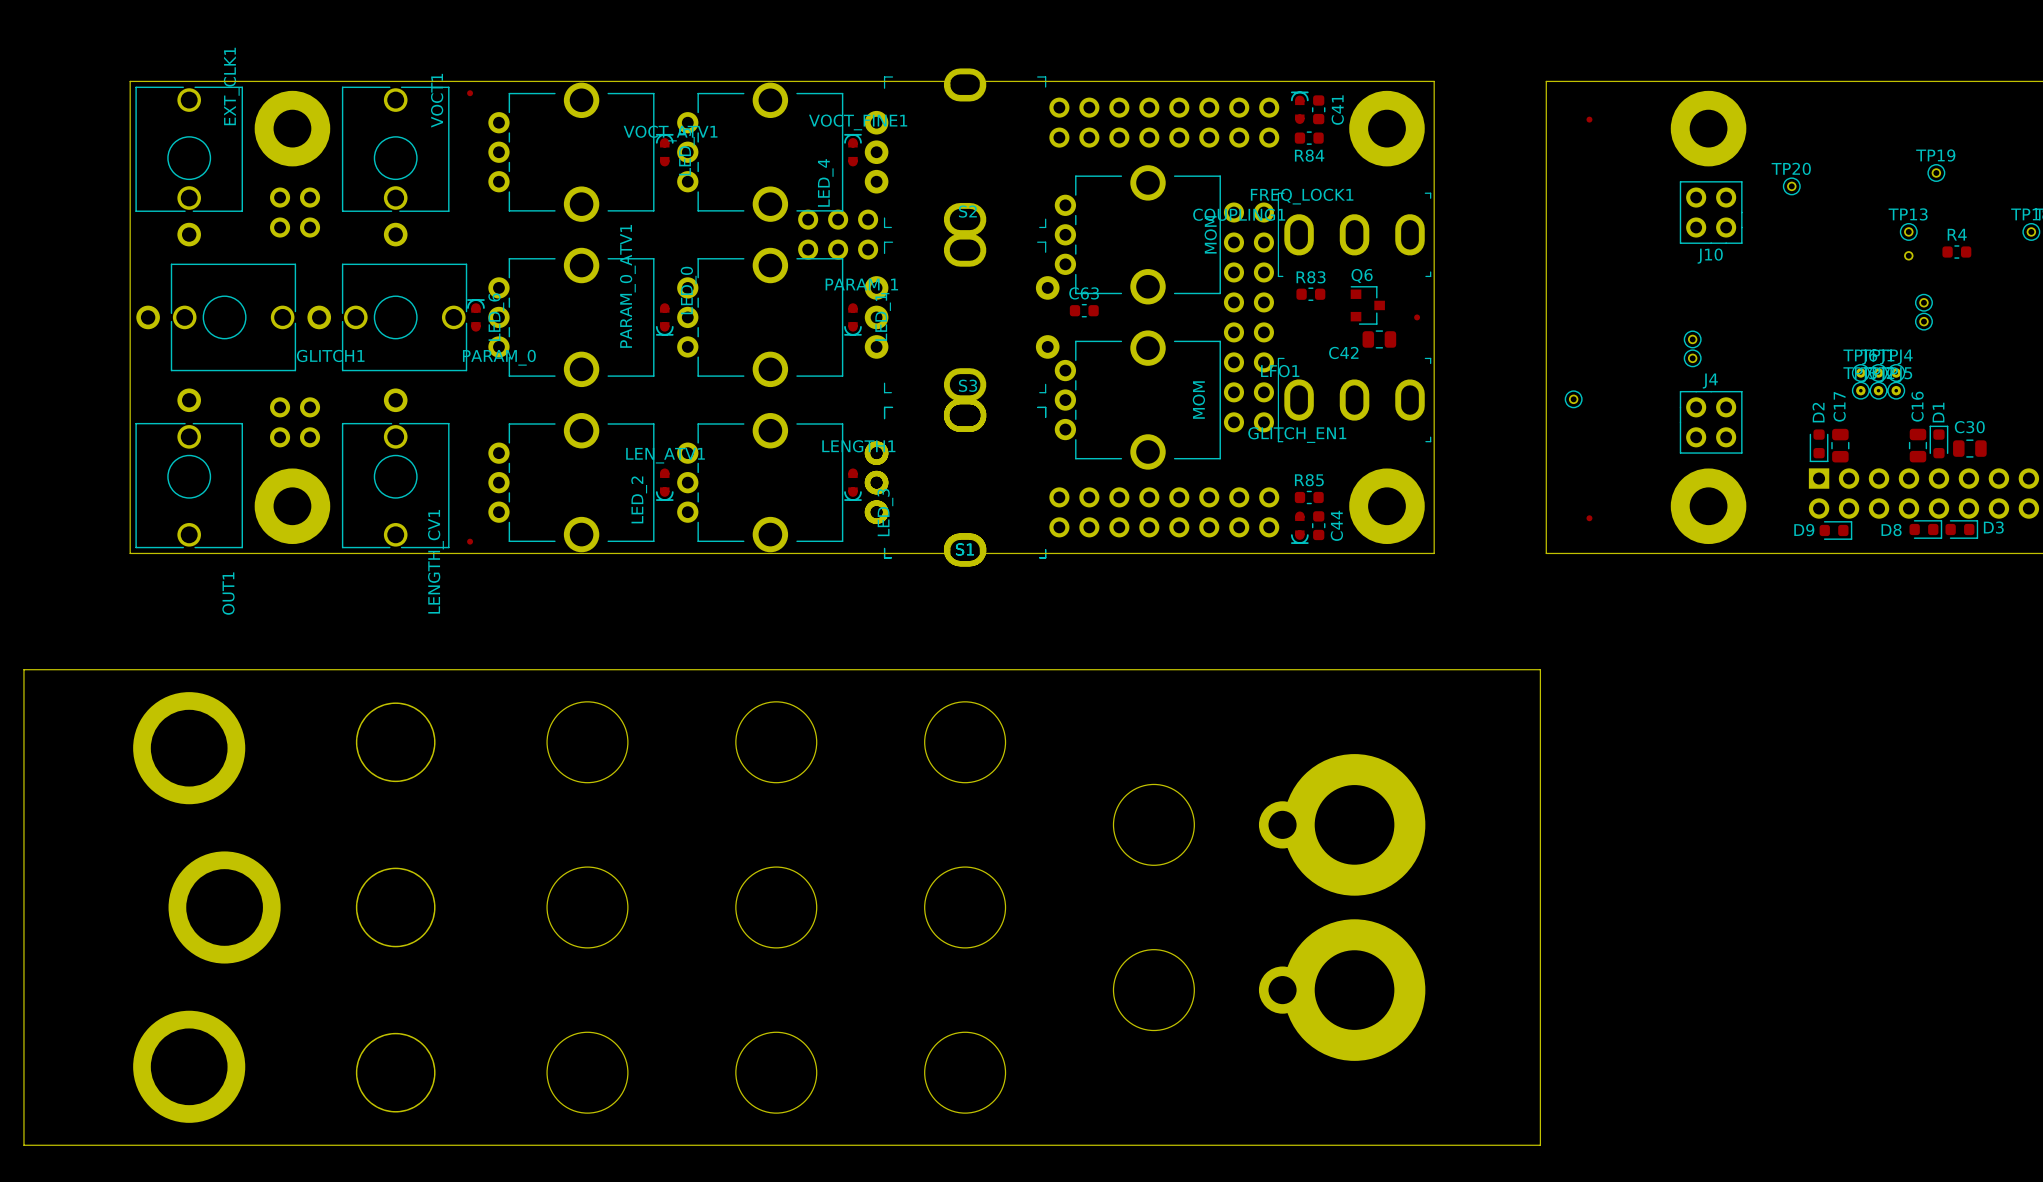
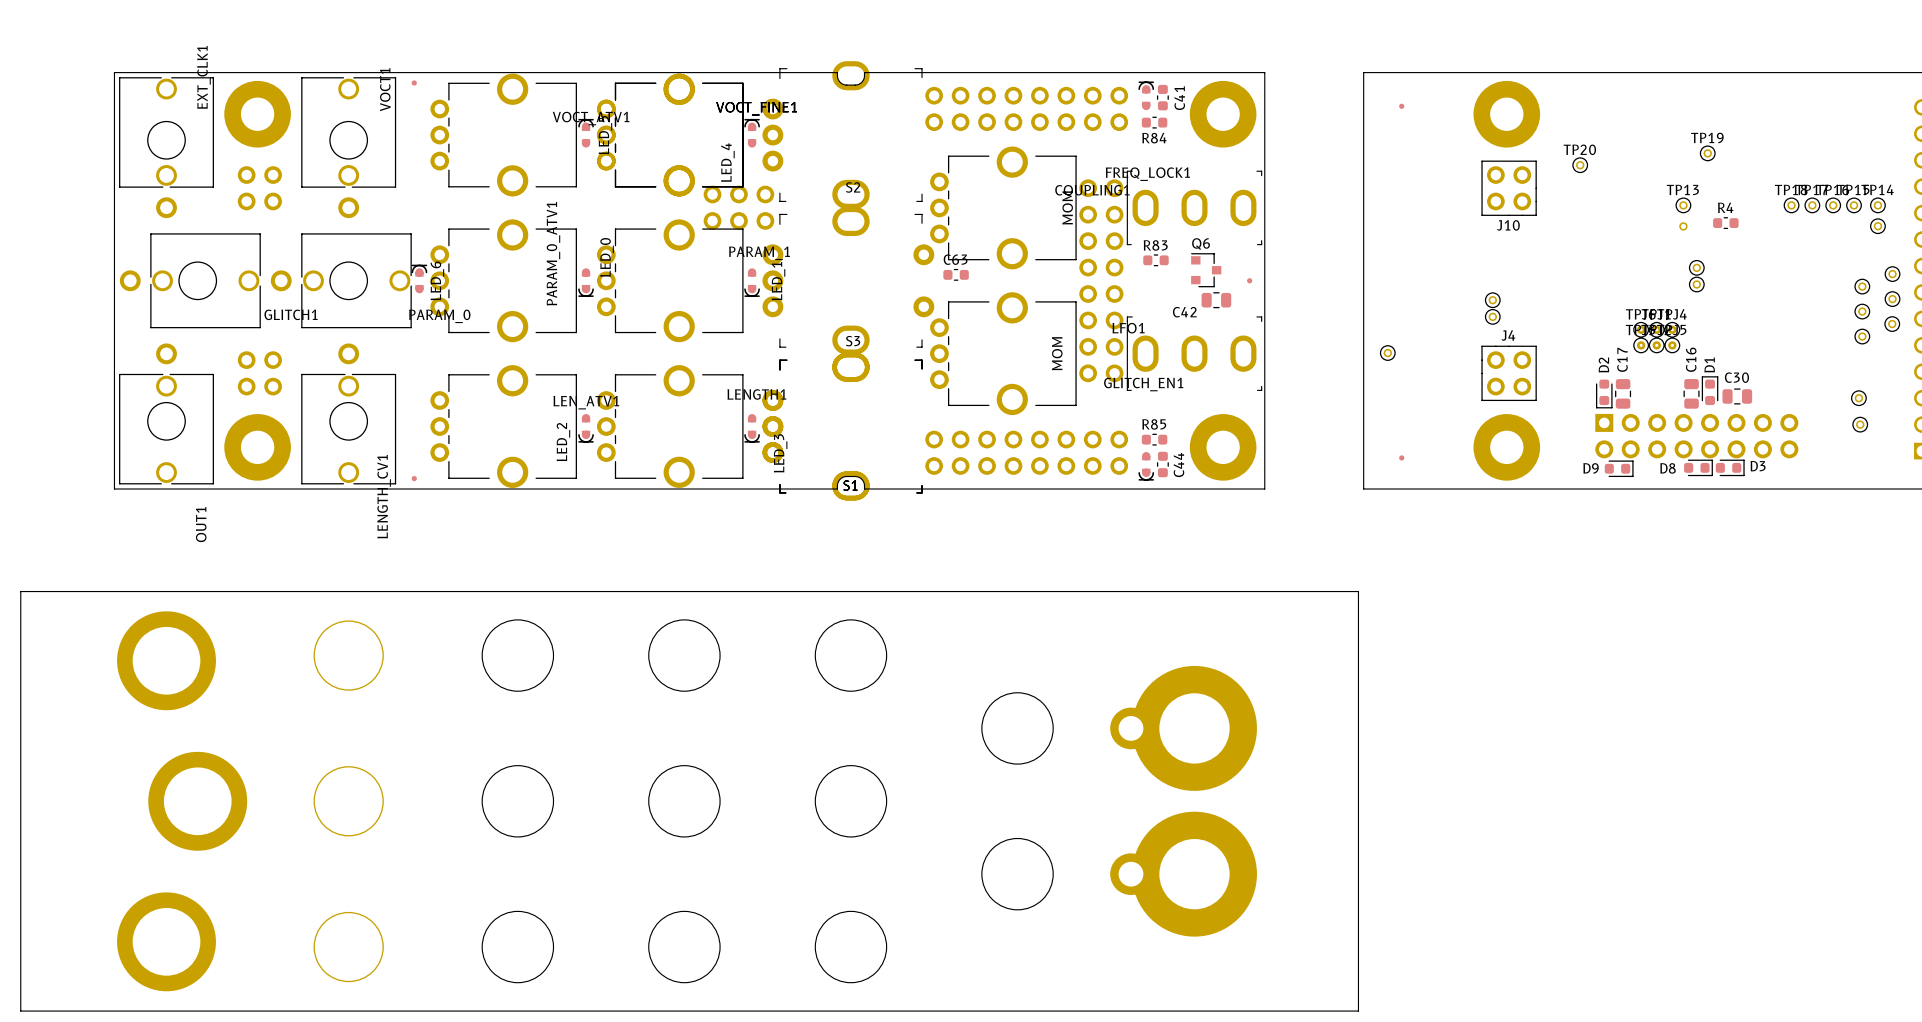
VOCT_FINE1: none -> (670, 135)

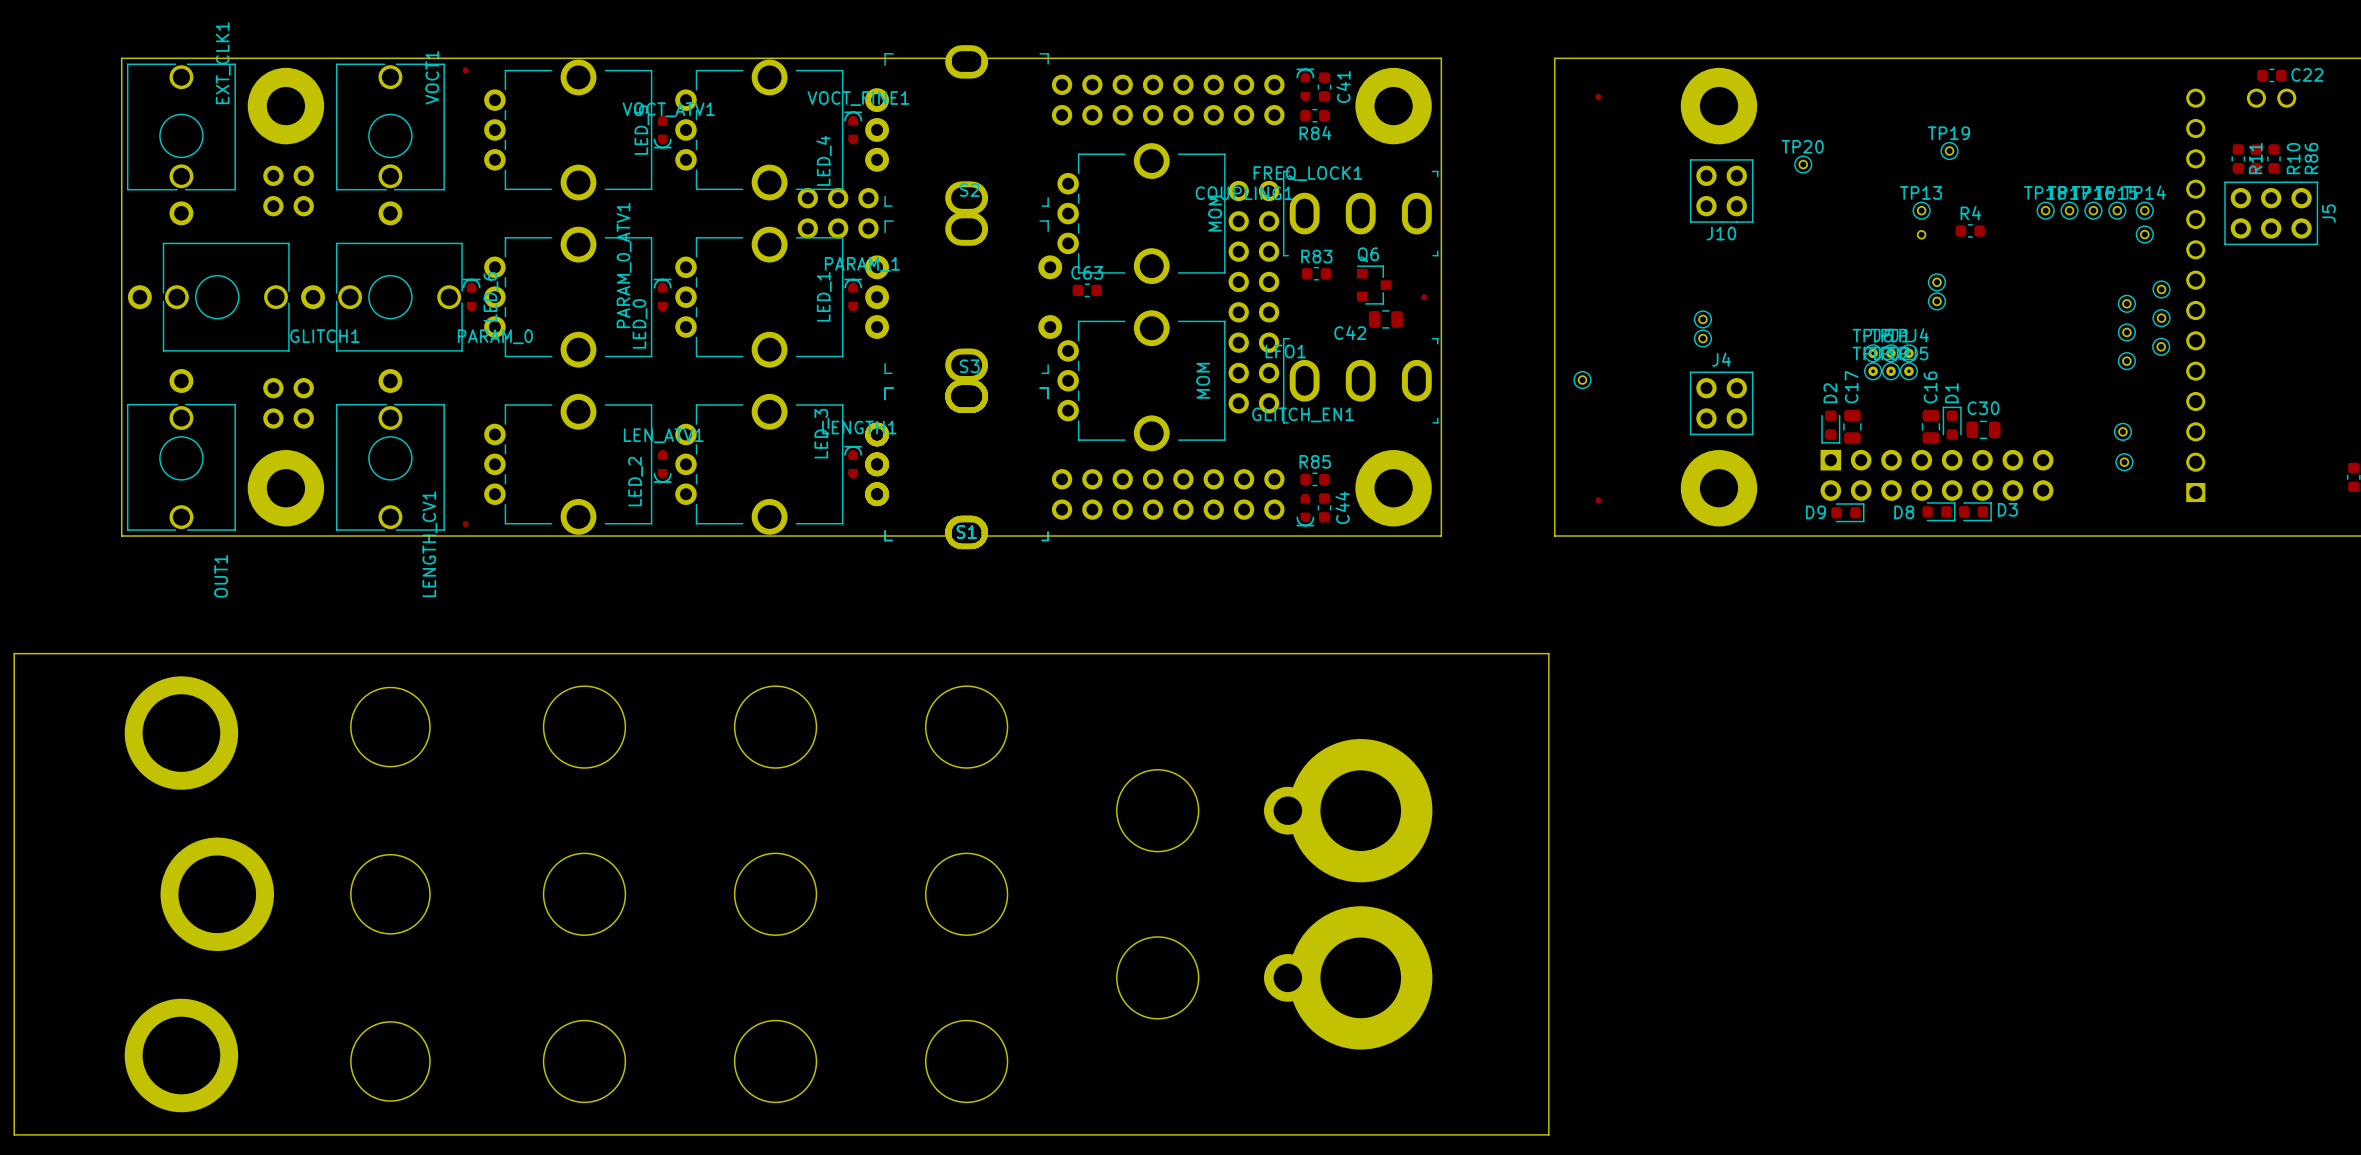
LED_5 rotation: 0° (586, 133) -> 180° (662, 132)
VOCT_FINE1: (670, 135) -> none
LED_0 rotation: 0° (586, 282) -> 180° (662, 295)
LED_1 rotation: 0° (752, 282) -> 180° (853, 295)
LED_3 rotation: 0° (752, 428) -> 180° (853, 462)

